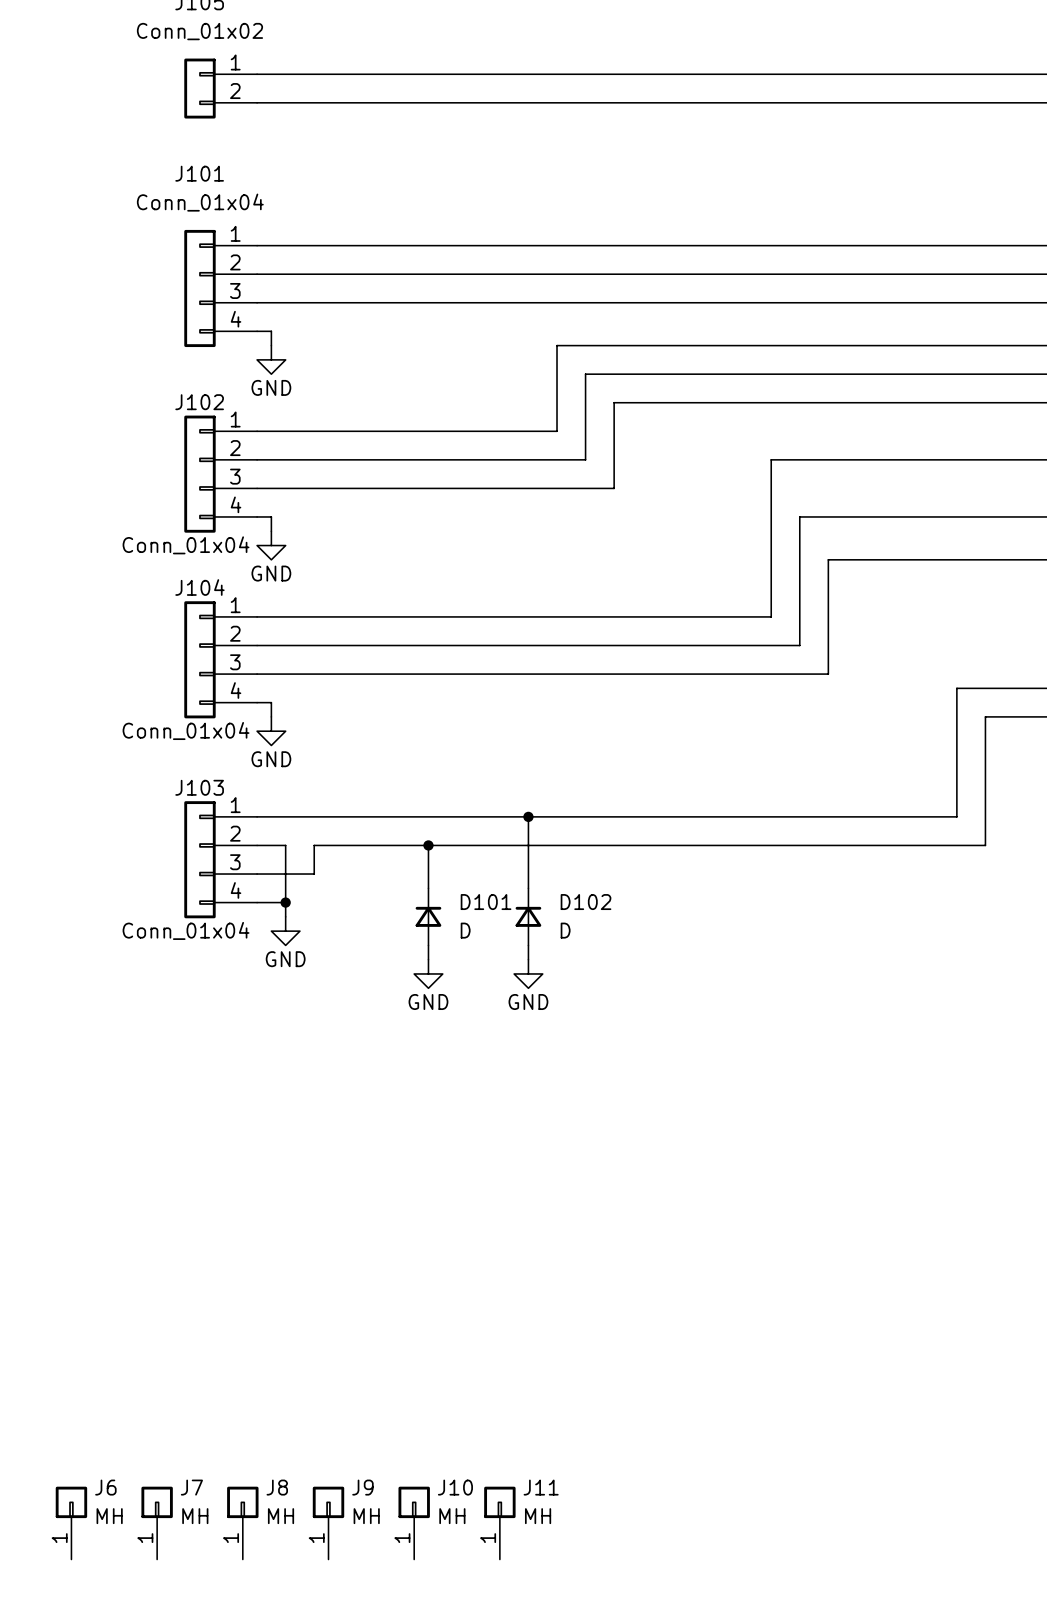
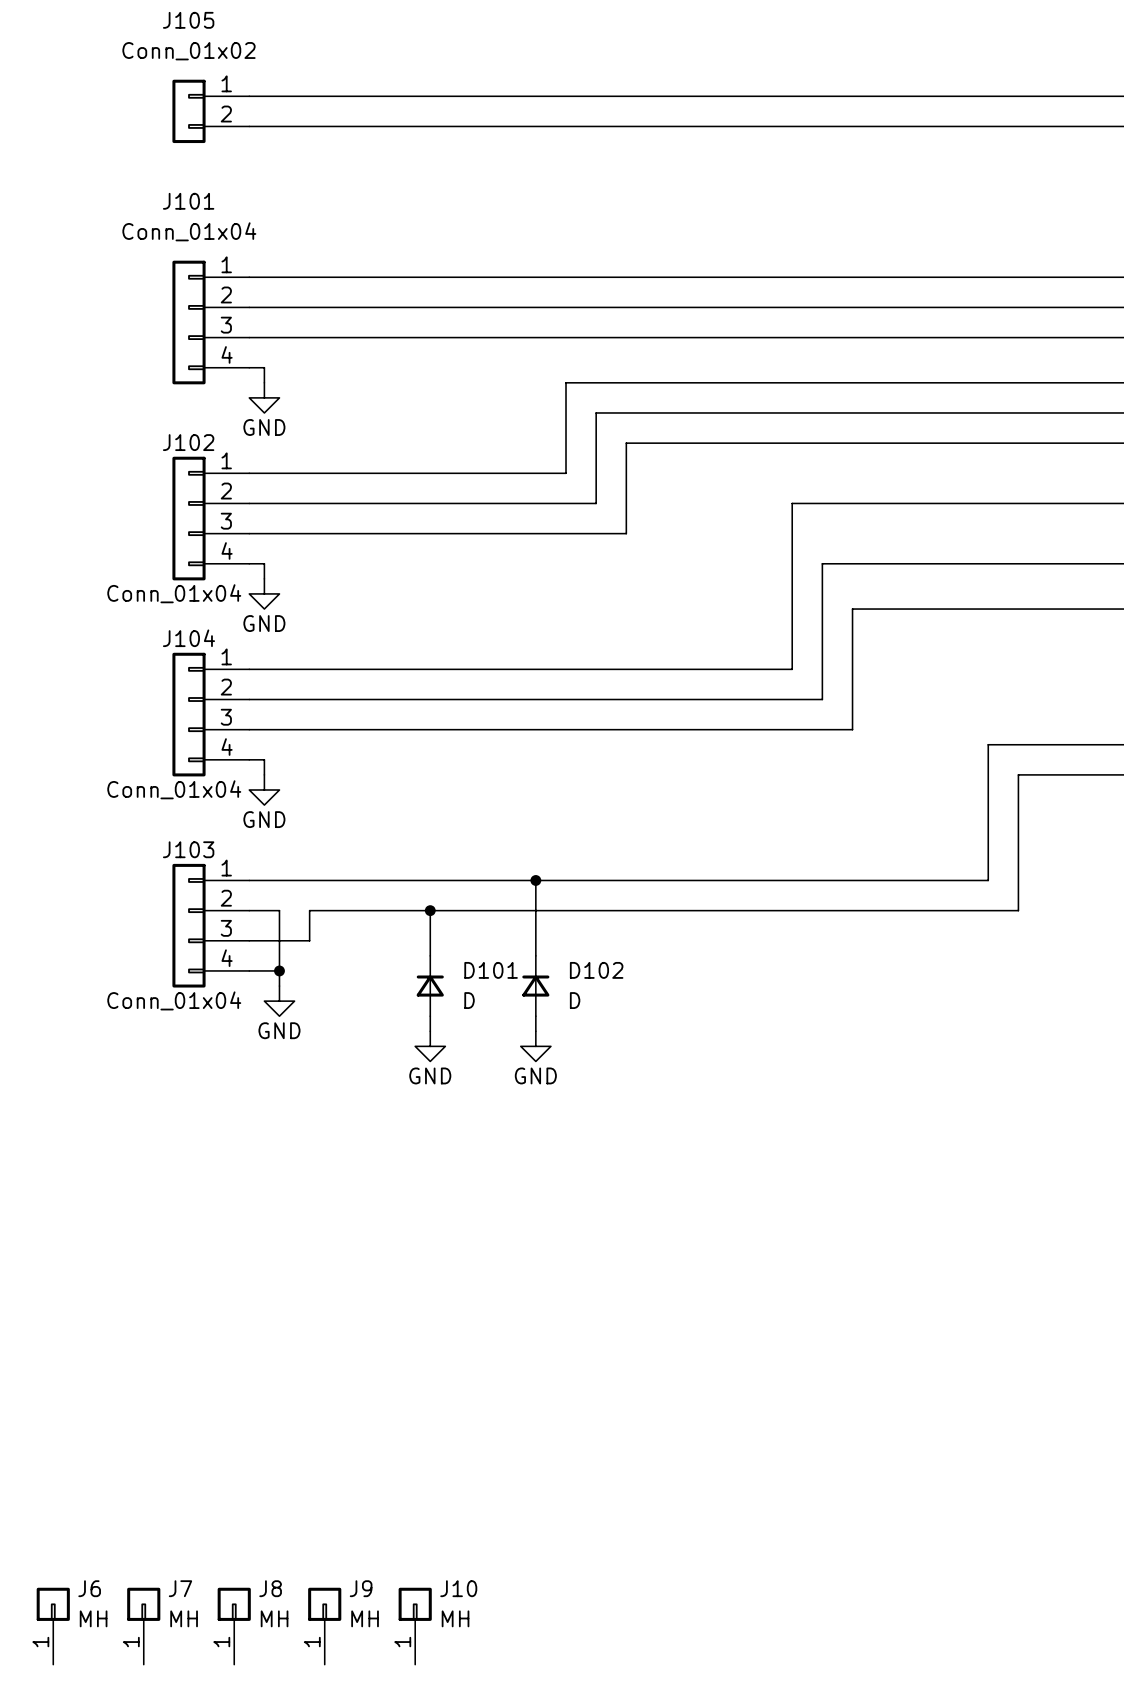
J11: MH (499, 1523) -> none

